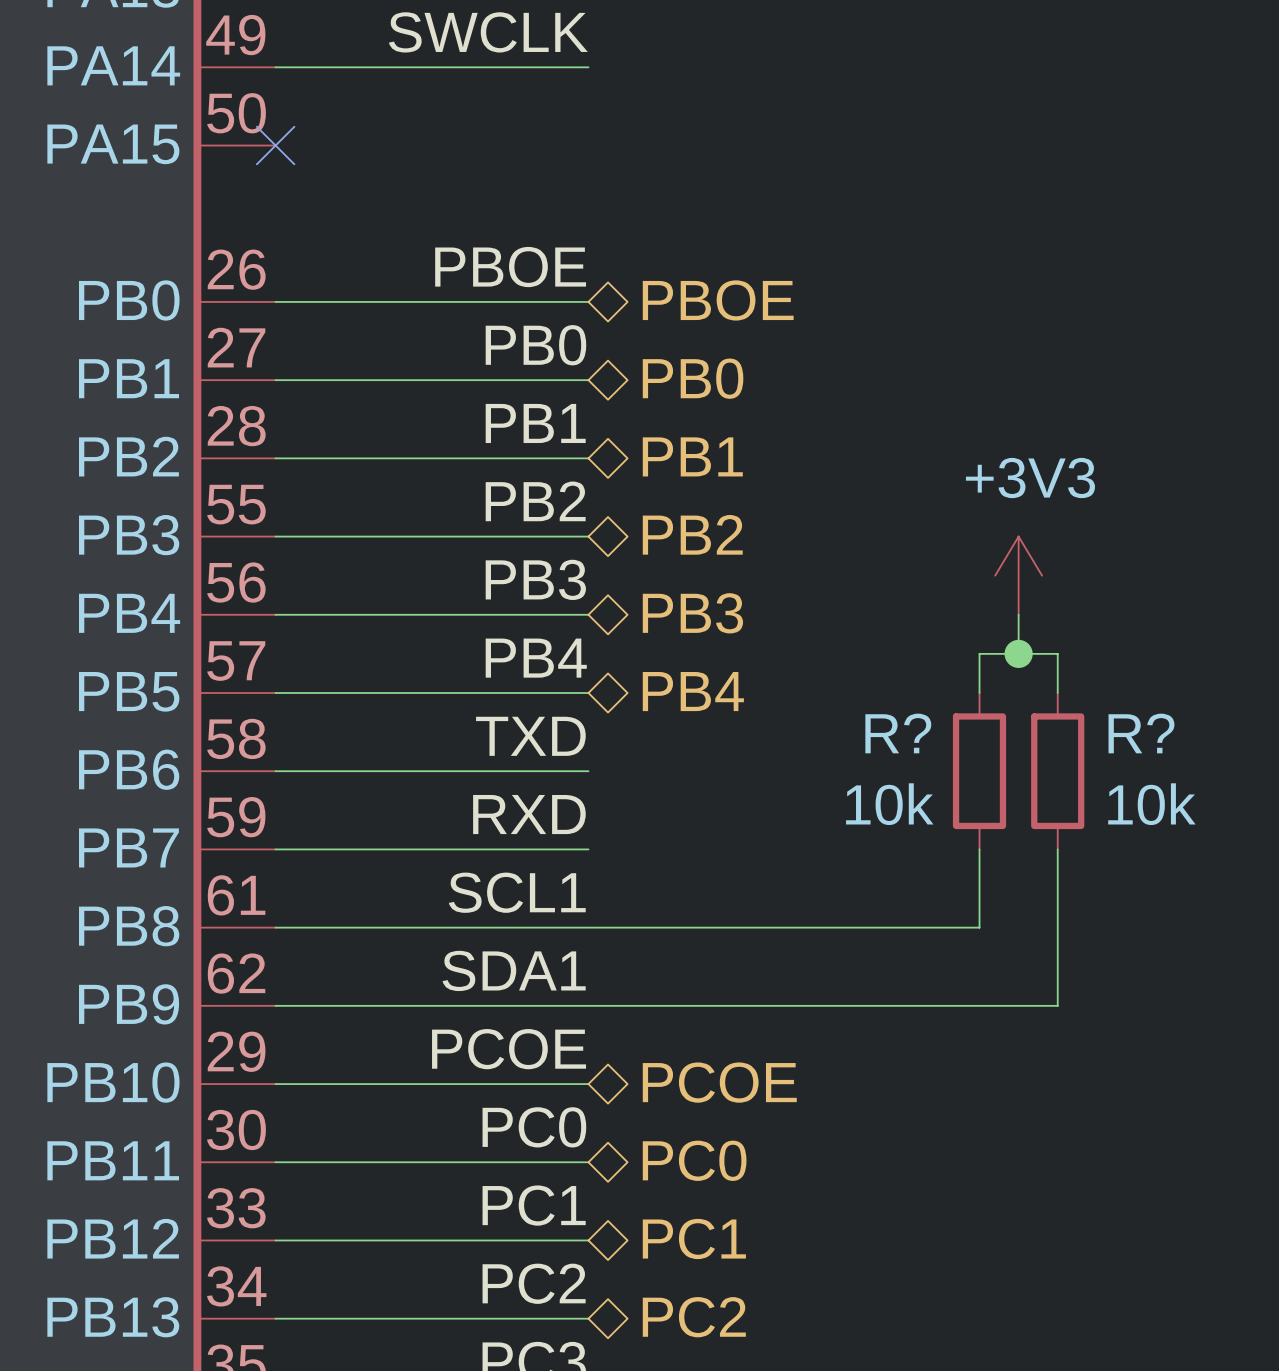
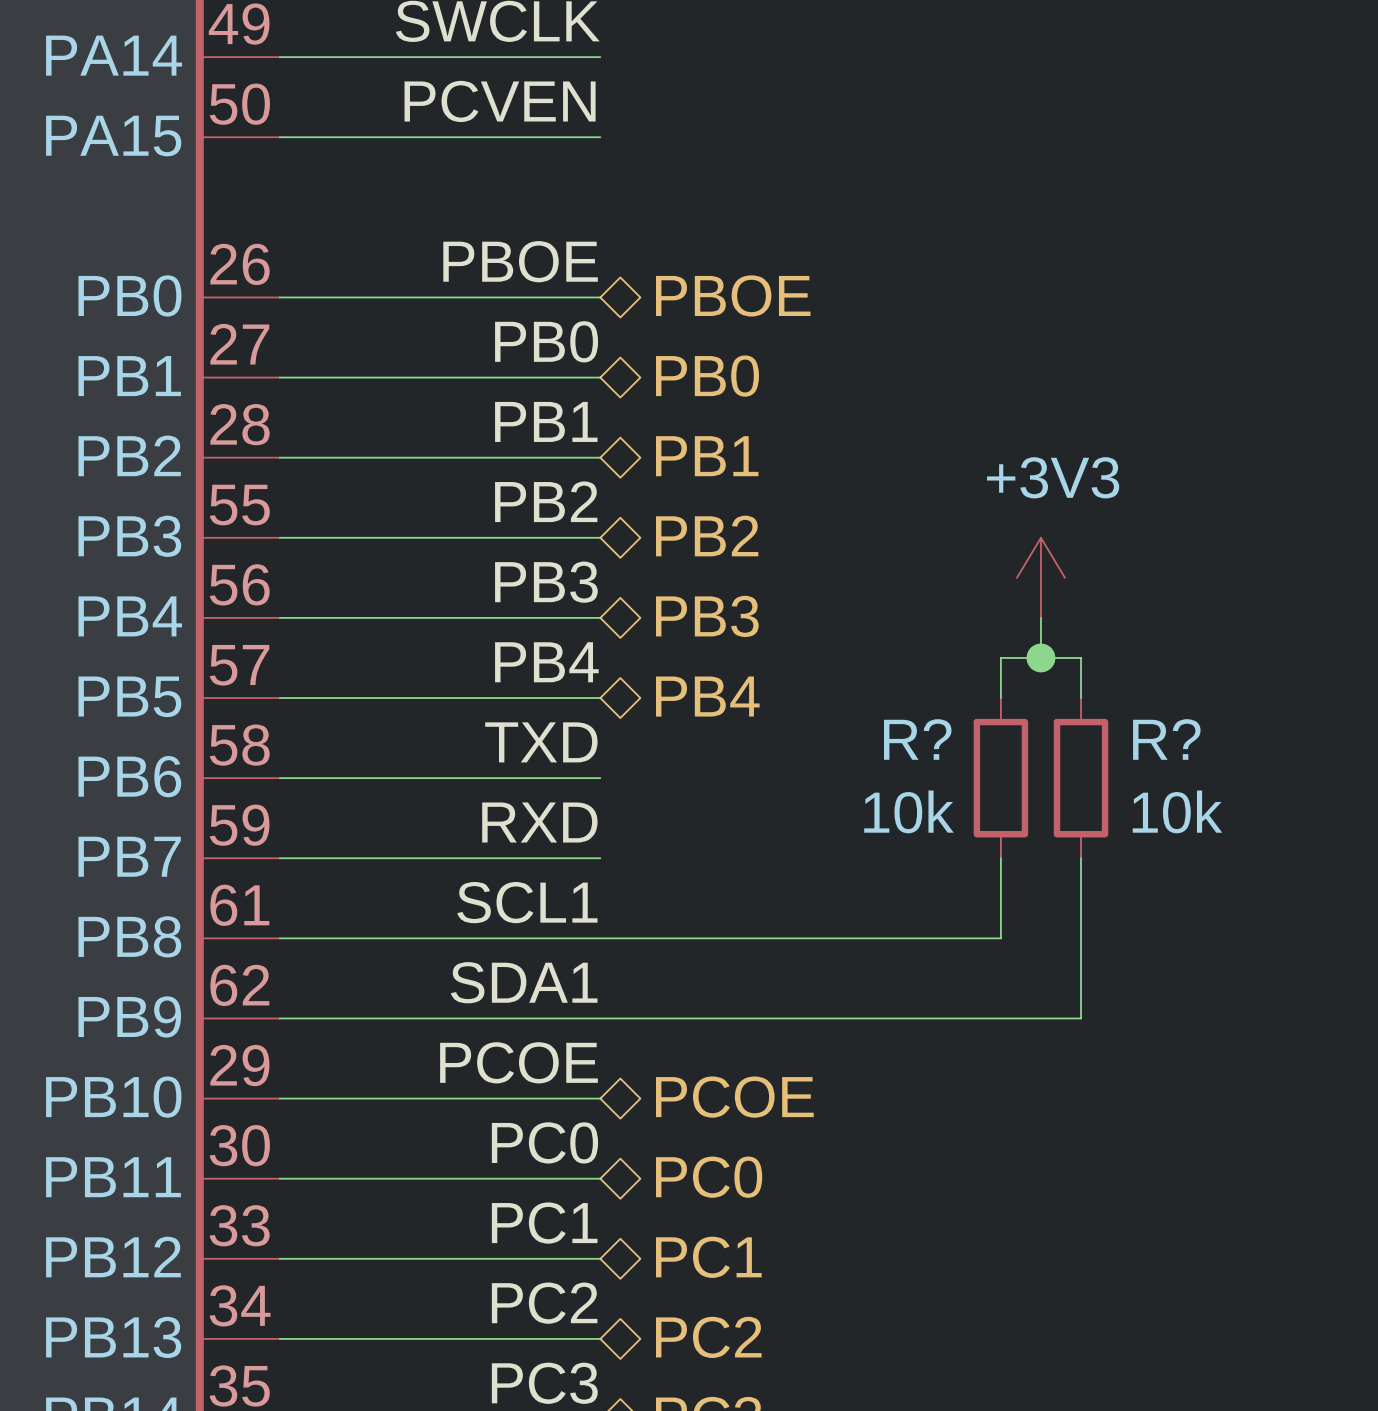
label: none -> PCVEN (500, 101)
wire: none -> (279, 137) (600, 137)
no-connect mark: (275, 145) -> none

